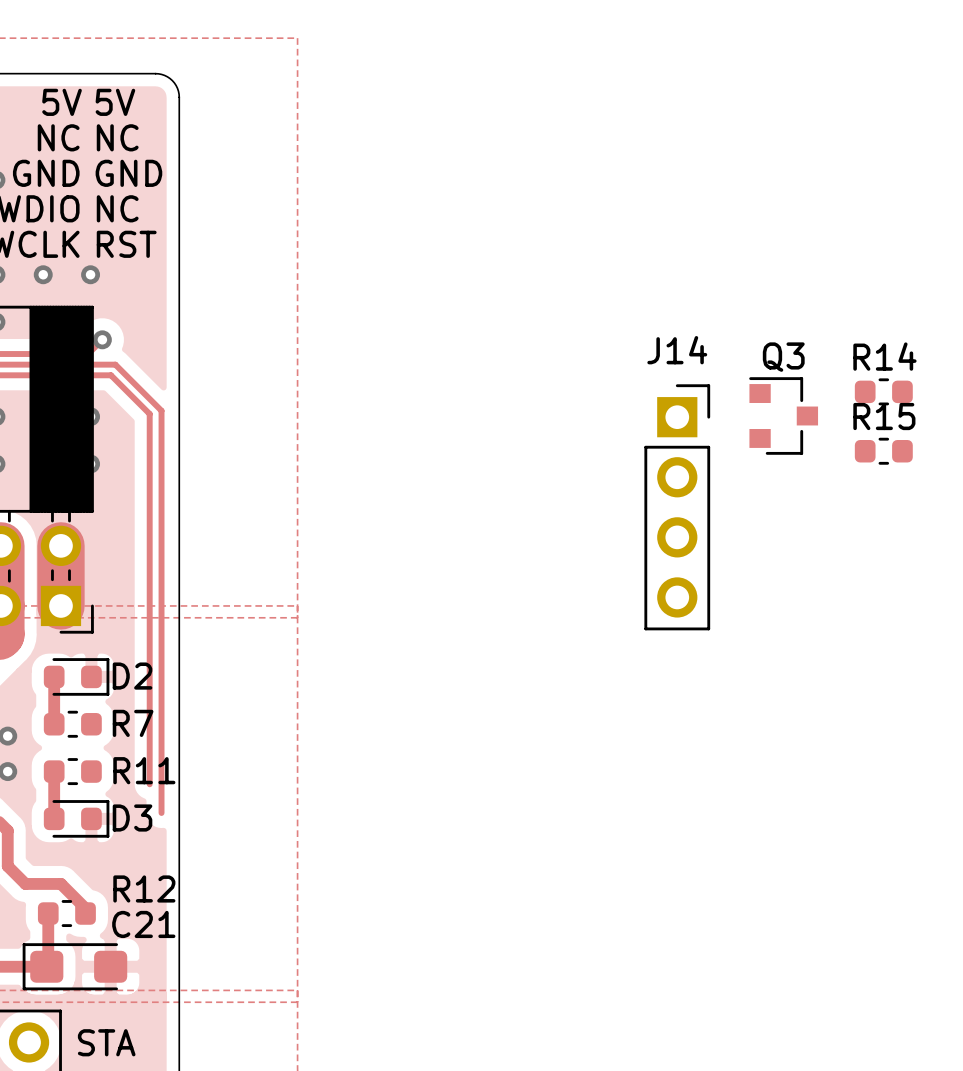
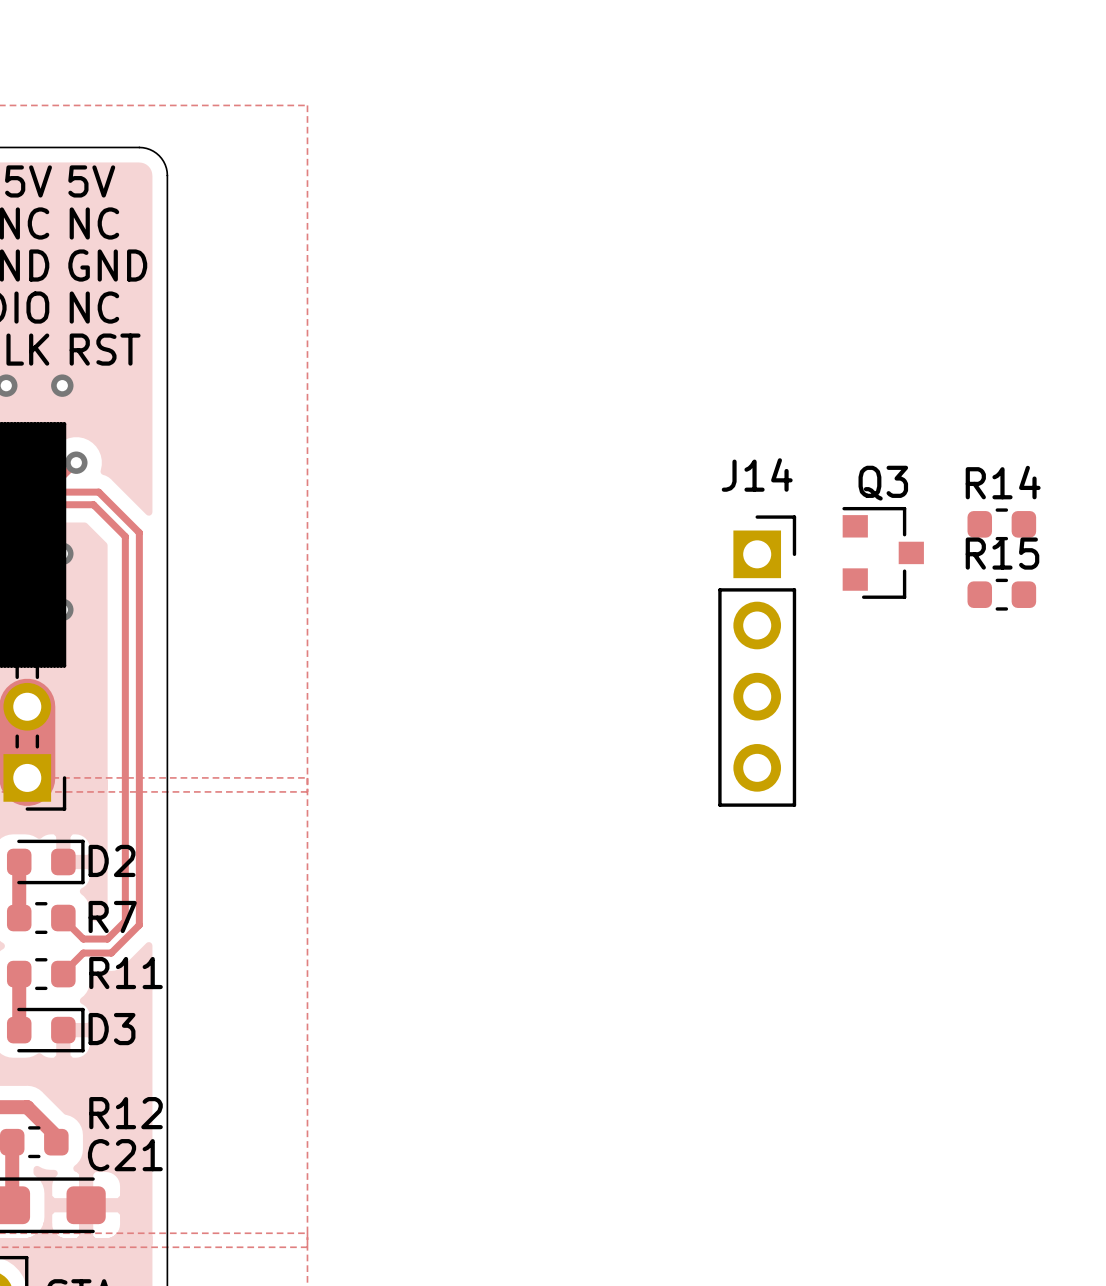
track: (115, 364) (161, 410) (161, 812) -> (91, 492) (98, 492) (139, 532) (139, 925) (111, 953) (83, 953) (63, 974)
track: (110, 375) (149, 414) (149, 784) -> (86, 504) (93, 504) (125, 536) (125, 921) (107, 939) (83, 939) (63, 918)

